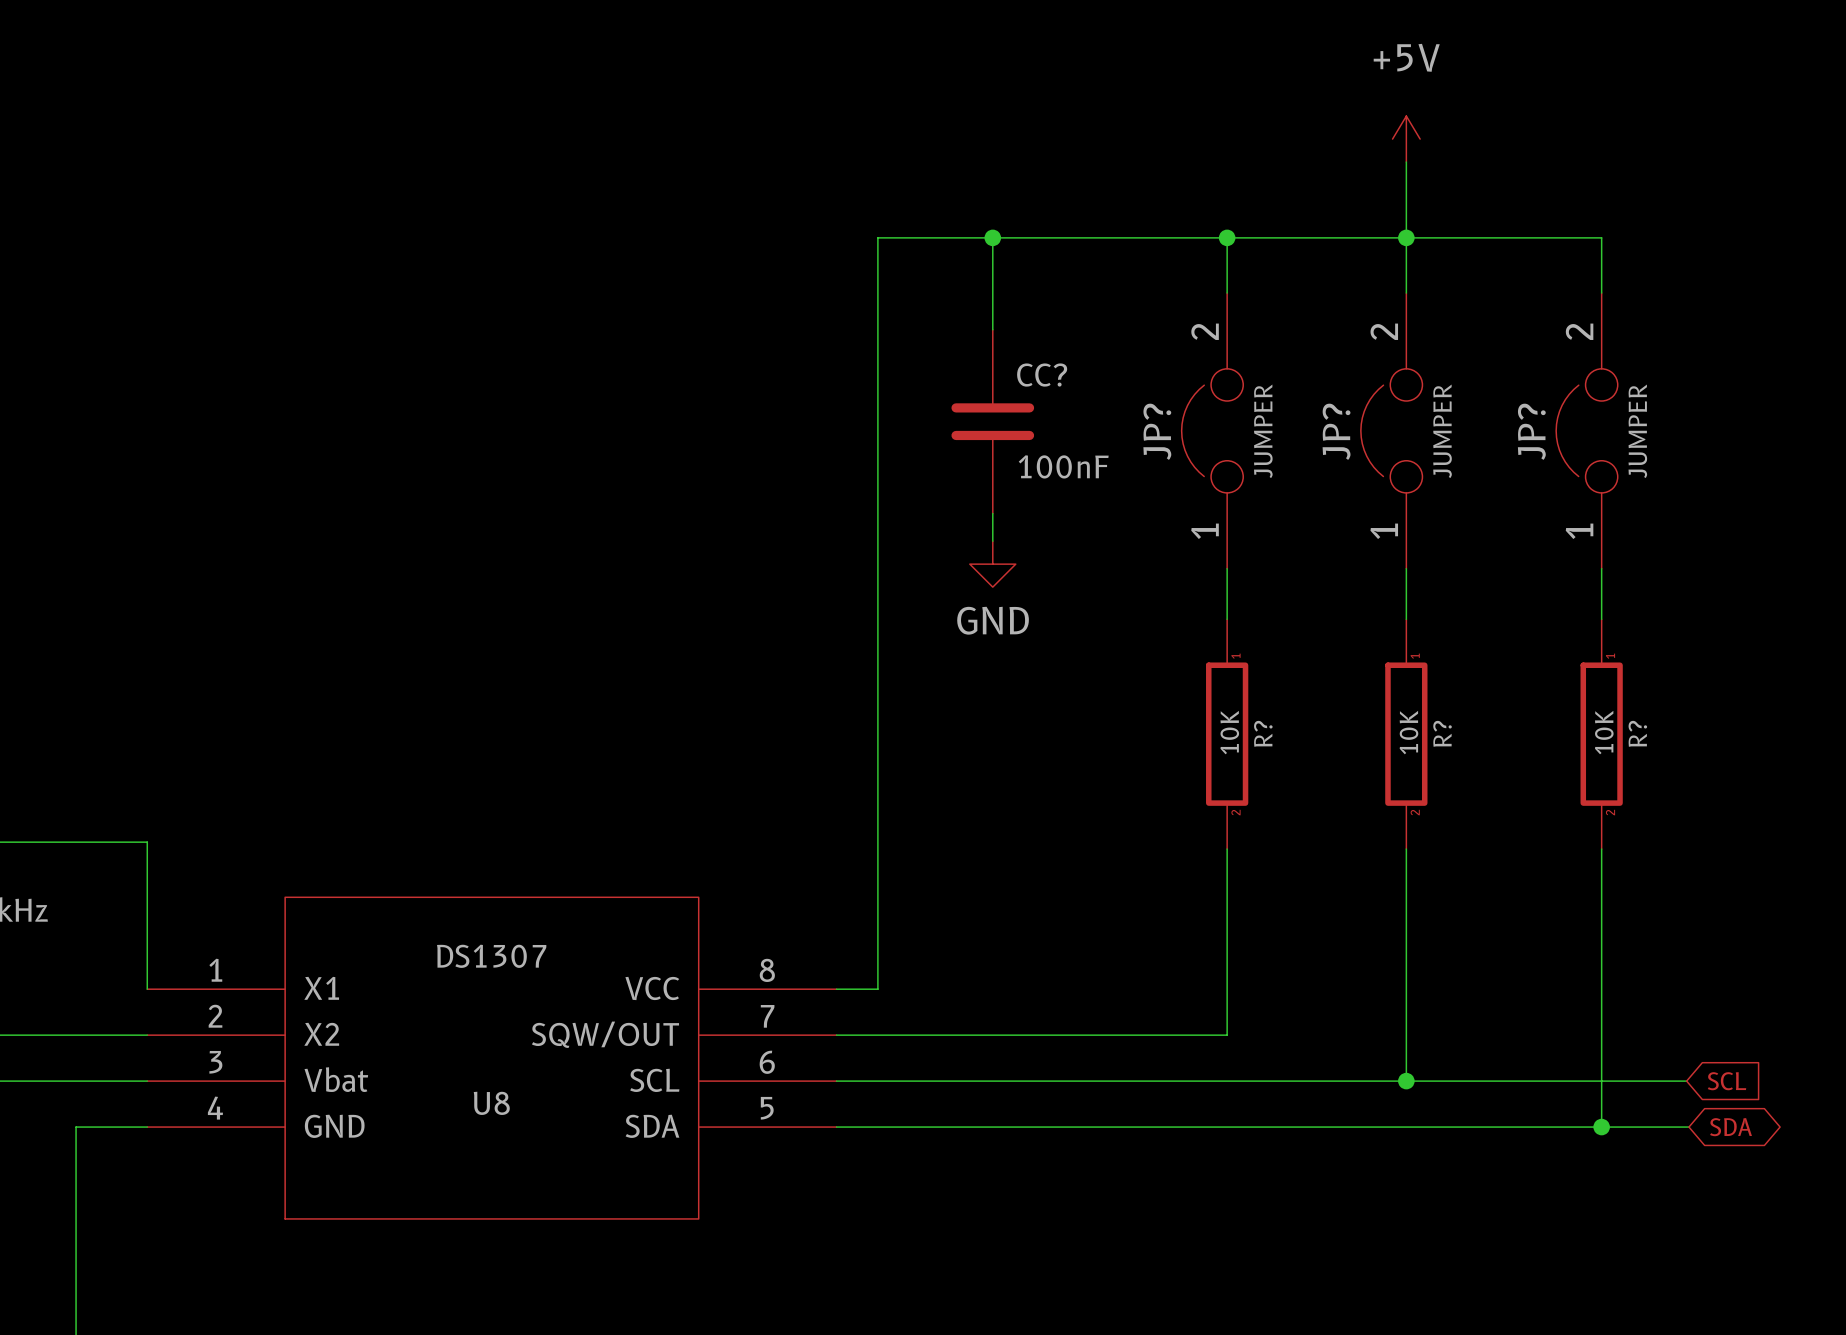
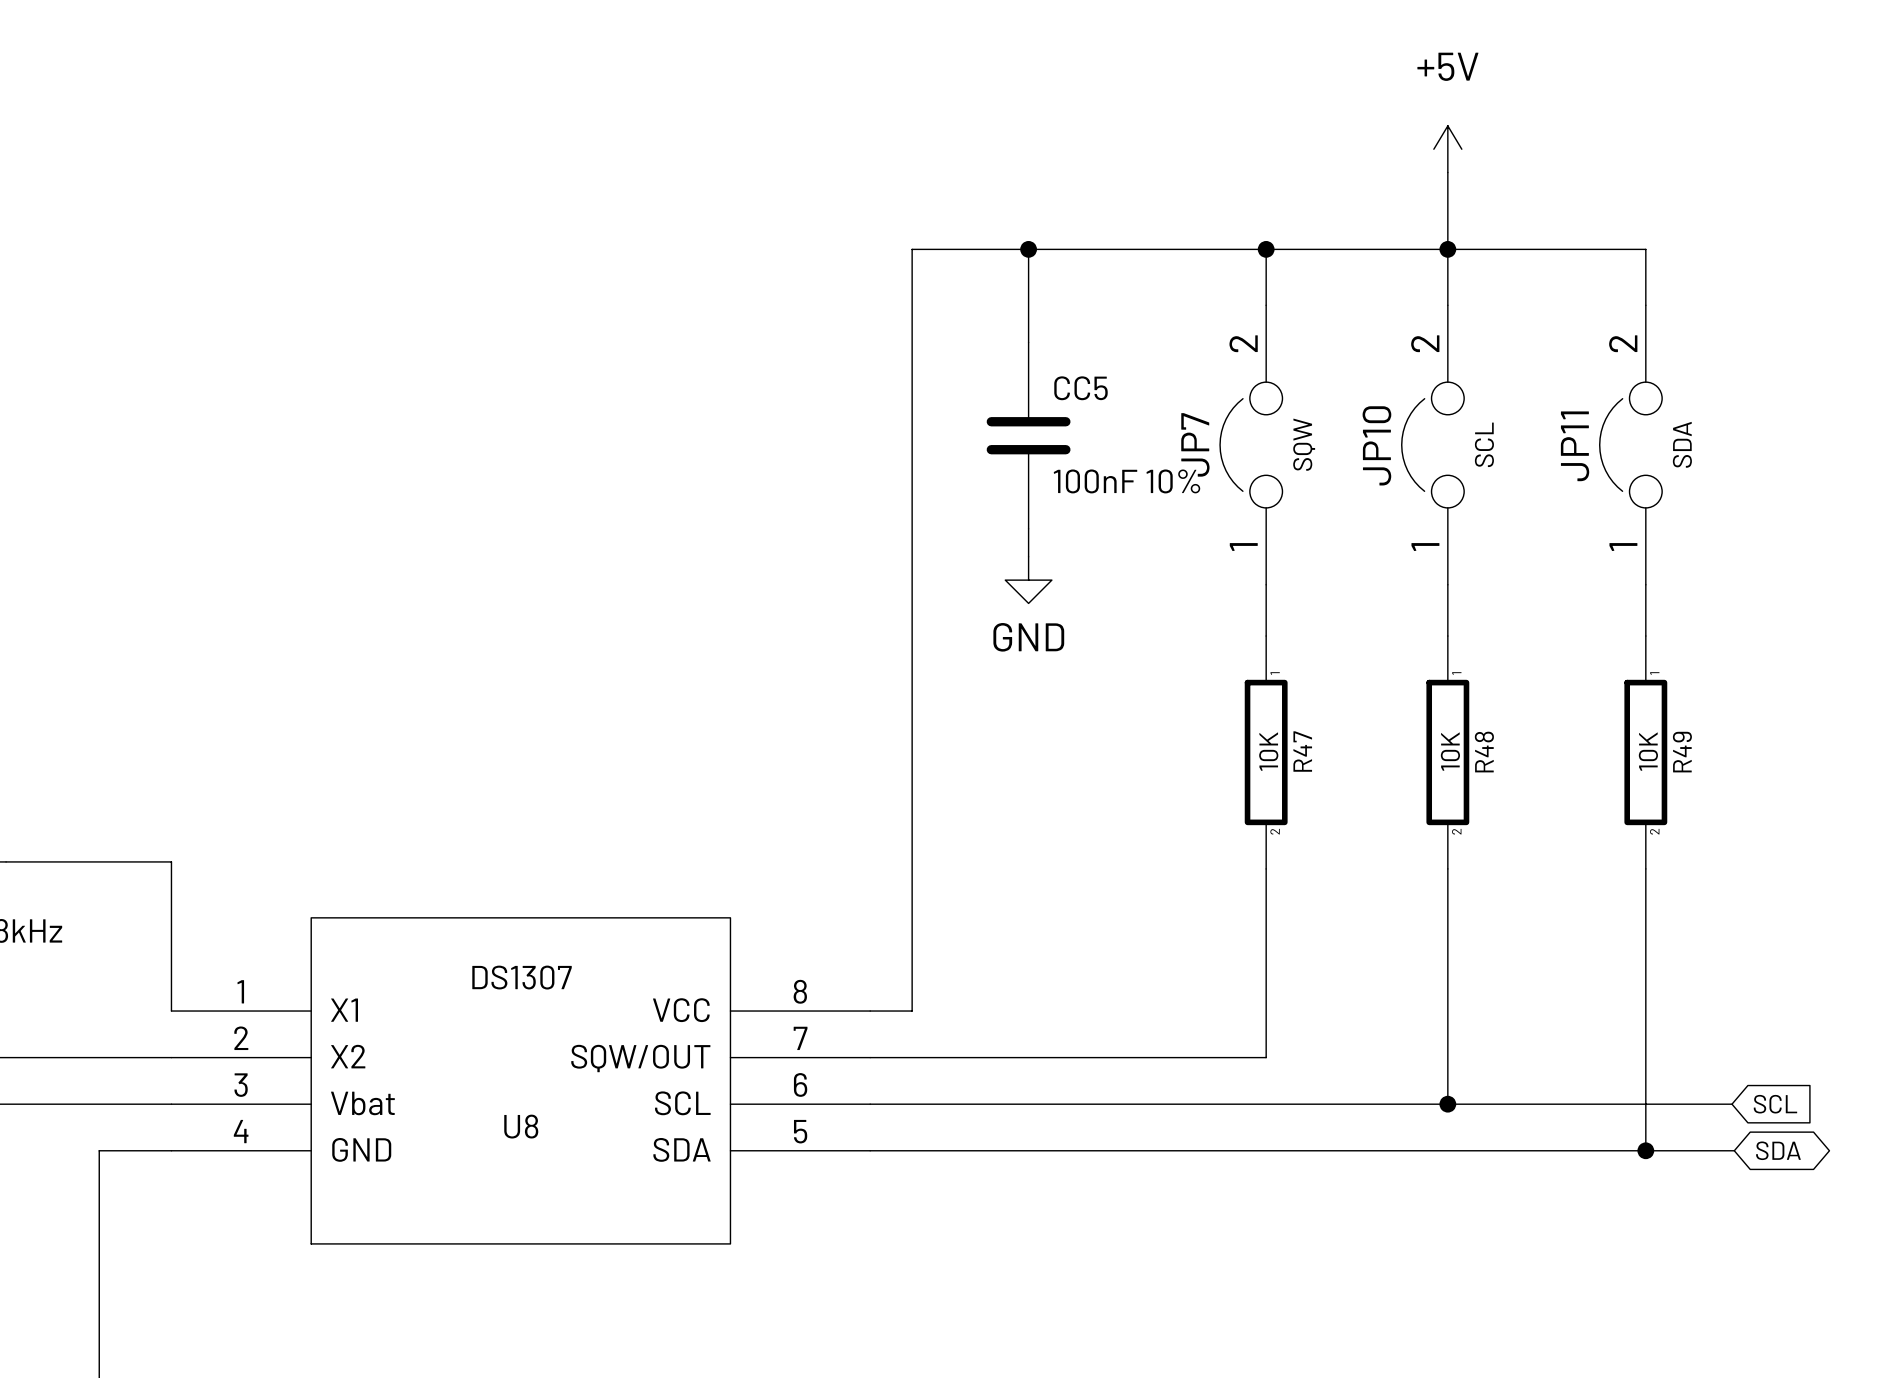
CC? name: CC? (1042, 375) -> CC5 (1081, 388)
JP? name: JP? (1157, 431) -> JP7 (1195, 444)
JP? value: JUMPER (1263, 431) -> SQW (1304, 444)
JP? name: JP? (1336, 431) -> JP10 (1376, 445)
JP? value: JUMPER (1442, 431) -> SCL (1484, 444)
JP? name: JP? (1531, 431) -> JP11 (1575, 446)
JP? value: JUMPER (1637, 431) -> SDA (1682, 444)
CC? value: 100nF (1063, 466) -> 100nF 10% (1127, 481)
R? name: R? (1263, 733) -> R47 (1302, 751)
R? name: R? (1442, 733) -> R48 (1484, 752)
R? name: R? (1637, 733) -> R49 (1682, 752)

